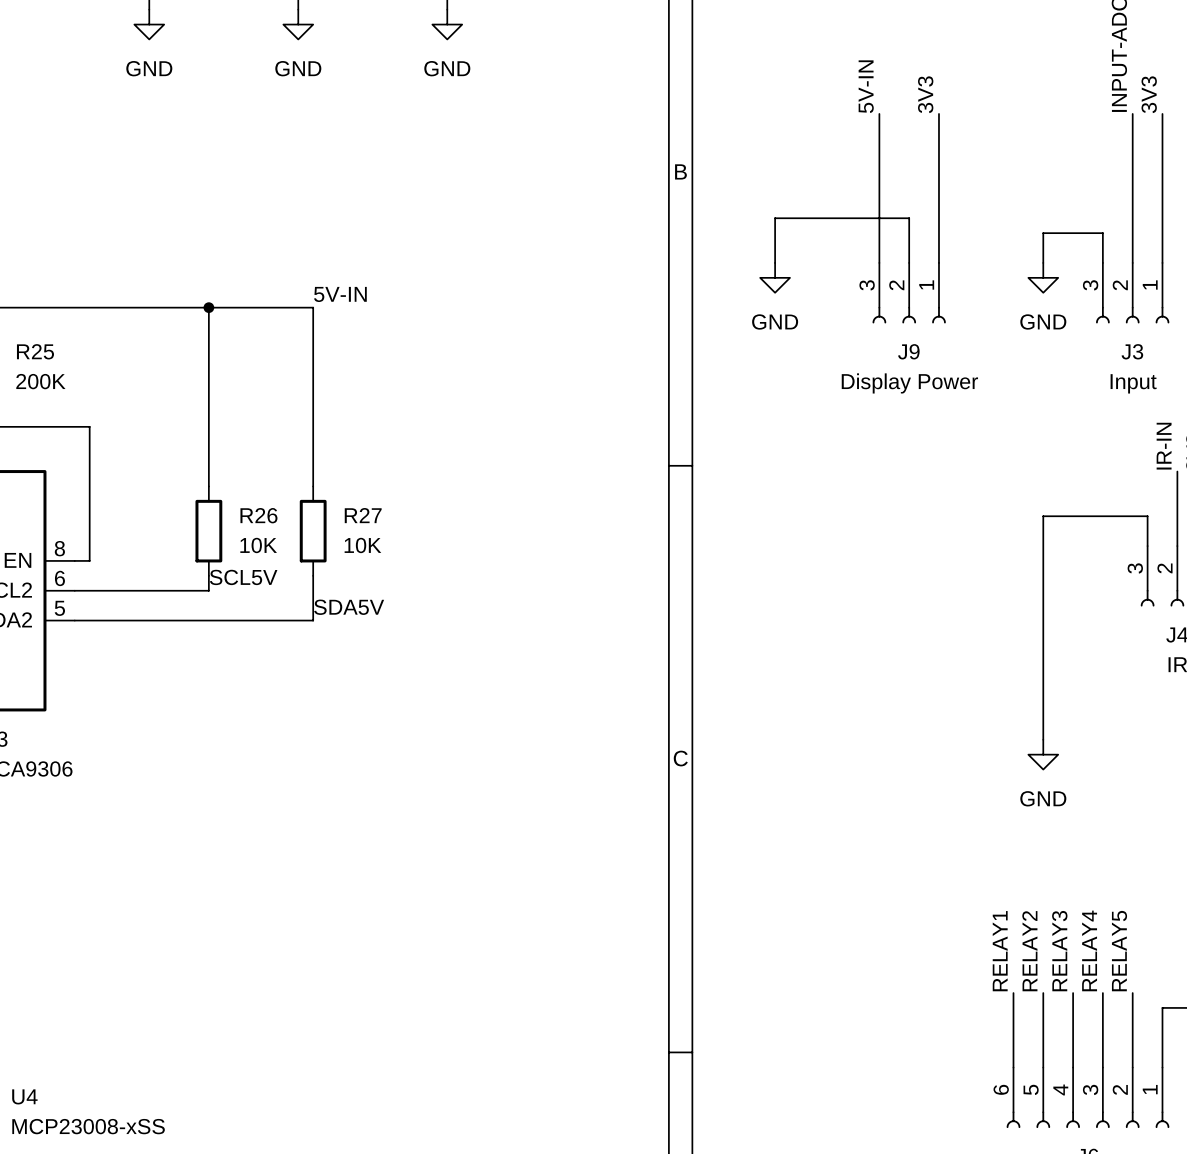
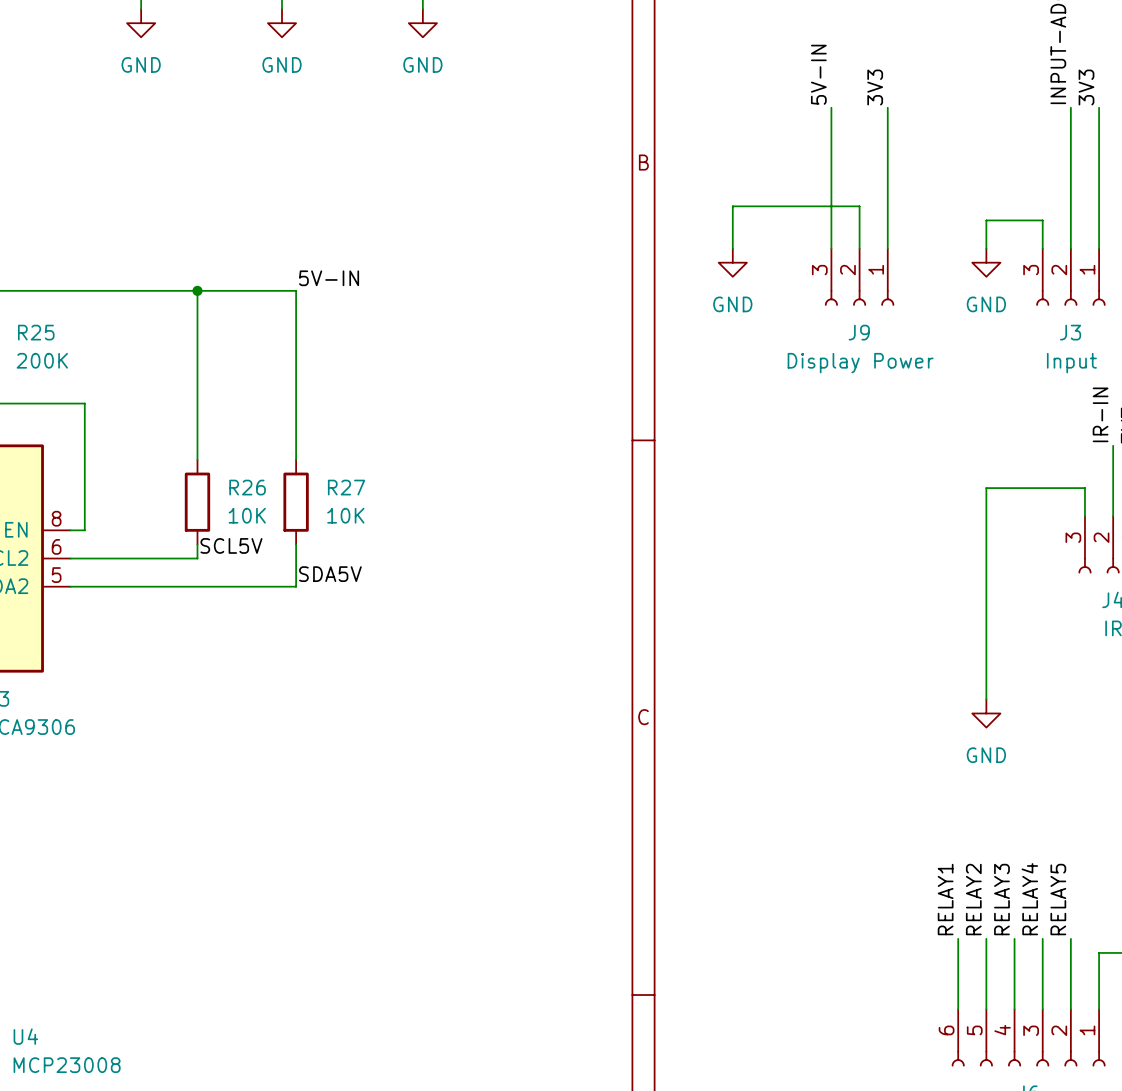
U4 value: MCP23008-xSS (88, 1126) -> MCP23008 (67, 1065)

